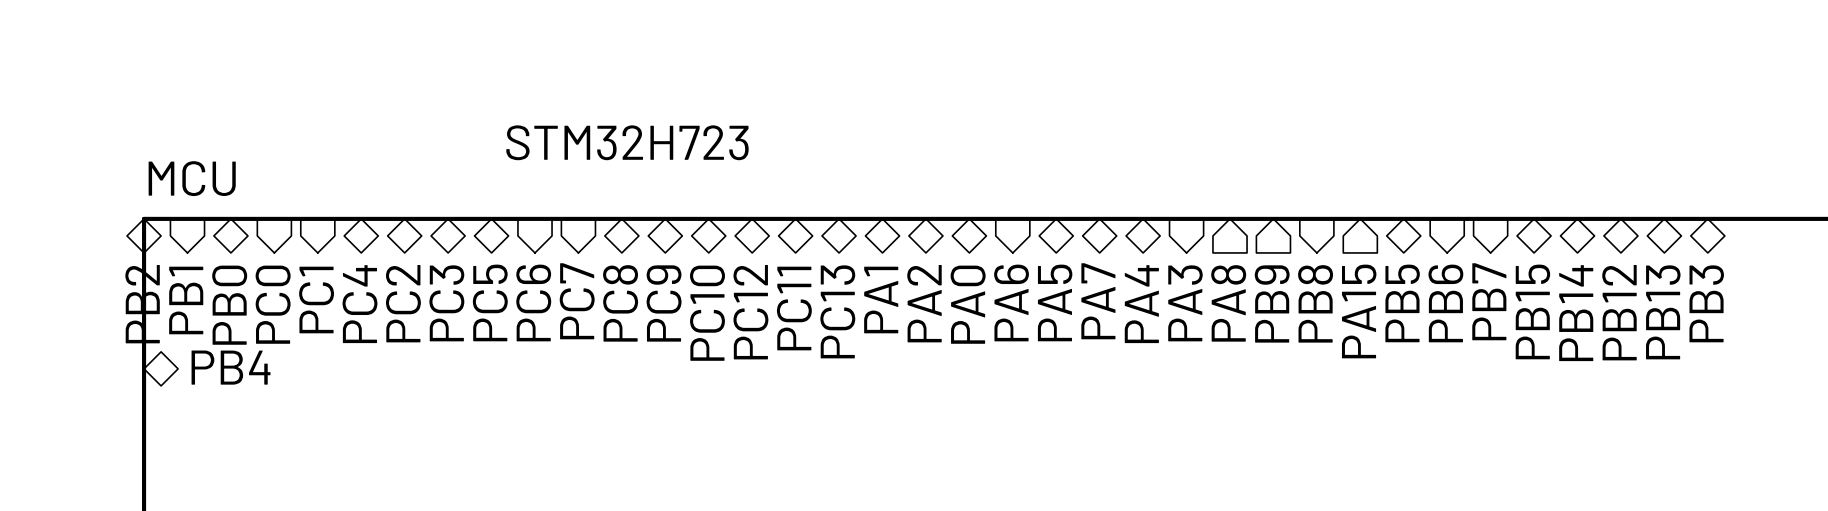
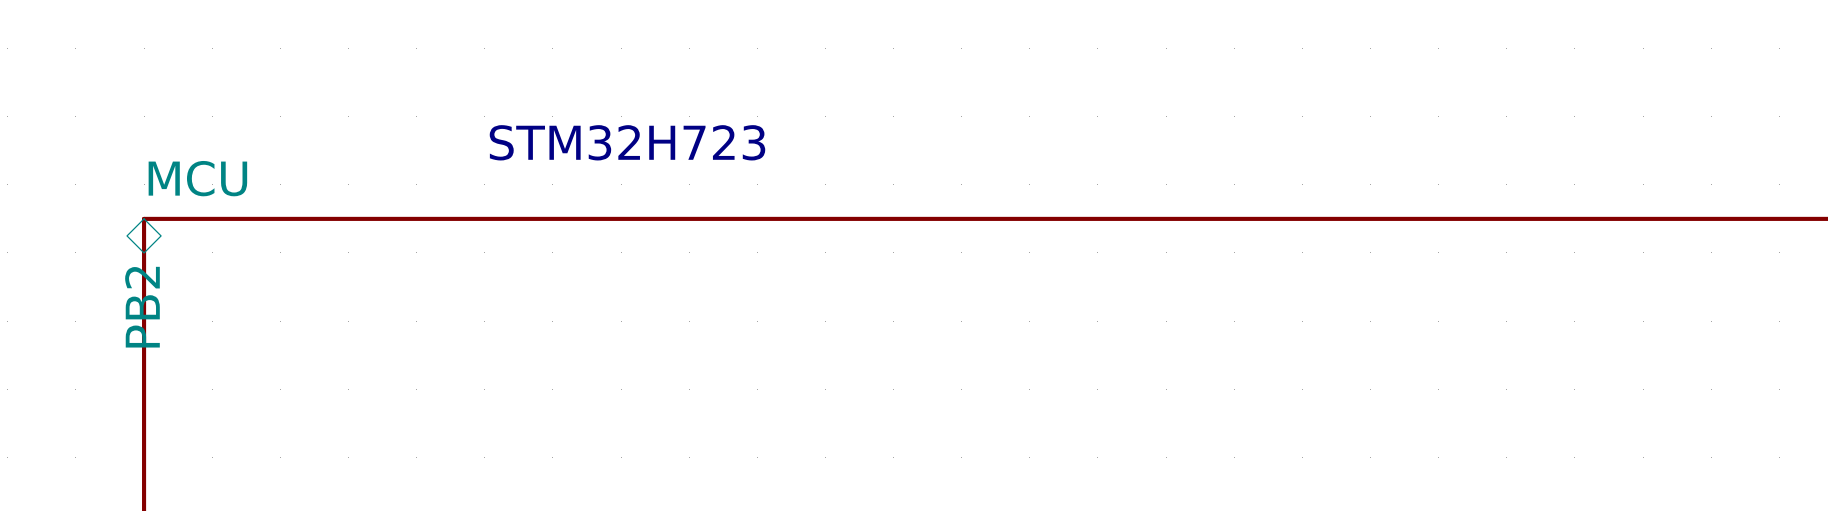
sheet pin: PB1 (186, 300) -> none
sheet pin: PC1 (316, 300) -> none
sheet pin: PA1 (881, 300) -> none
sheet pin: PC7 (577, 301) -> none
sheet pin: PA7 (1098, 301) -> none
sheet pin: PB7 (1489, 301) -> none
sheet pin: PC5 (490, 302) -> none
sheet pin: PC6 (533, 302) -> none
sheet pin: PA6 (1011, 302) -> none
sheet pin: PA5 (1055, 302) -> none
sheet pin: PC2 (403, 303) -> none
sheet pin: PC3 (446, 303) -> none
sheet pin: PC8 (620, 303) -> none
sheet pin: PC9 (664, 303) -> none
sheet pin: PA2 (924, 303) -> none
sheet pin: PA3 (1185, 303) -> none
sheet pin: PA8 (1228, 303) -> none
sheet pin: PB9 (1272, 303) -> none
sheet pin: PB8 (1315, 303) -> none
sheet pin: PB5 (1402, 303) -> none
sheet pin: PB6 (1445, 303) -> none
sheet pin: PB3 (1706, 303) -> none
sheet pin: PC0 (273, 304) -> none
sheet pin: PC4 (359, 304) -> none
sheet pin: PA0 (968, 304) -> none
sheet pin: PA4 (1141, 304) -> none
sheet pin: PB0 (229, 305) -> none
sheet pin: PC11 (794, 308) -> none
sheet pin: PC13 (837, 311) -> none
sheet pin: PA15 (1359, 311) -> none
sheet pin: PB15 (1532, 311) -> none
sheet pin: PC12 (750, 312) -> none
sheet pin: PB12 (1619, 312) -> none
sheet pin: PB13 (1663, 312) -> none
sheet pin: PC10 (707, 313) -> none
sheet pin: PB14 (1576, 313) -> none
sheet pin: PB4 (231, 367) -> none

